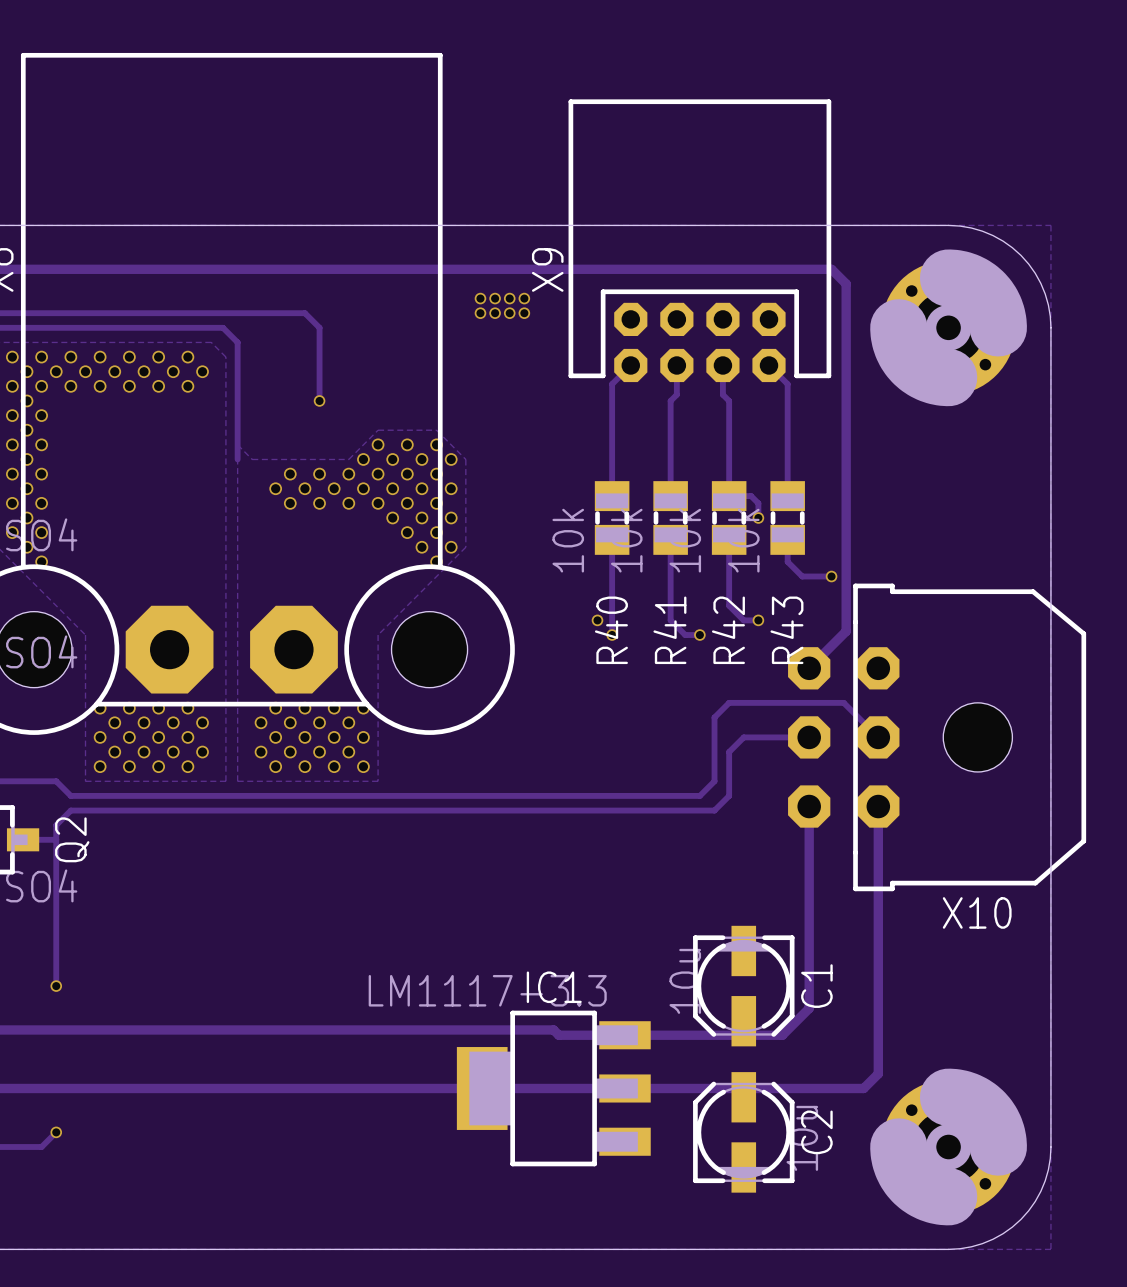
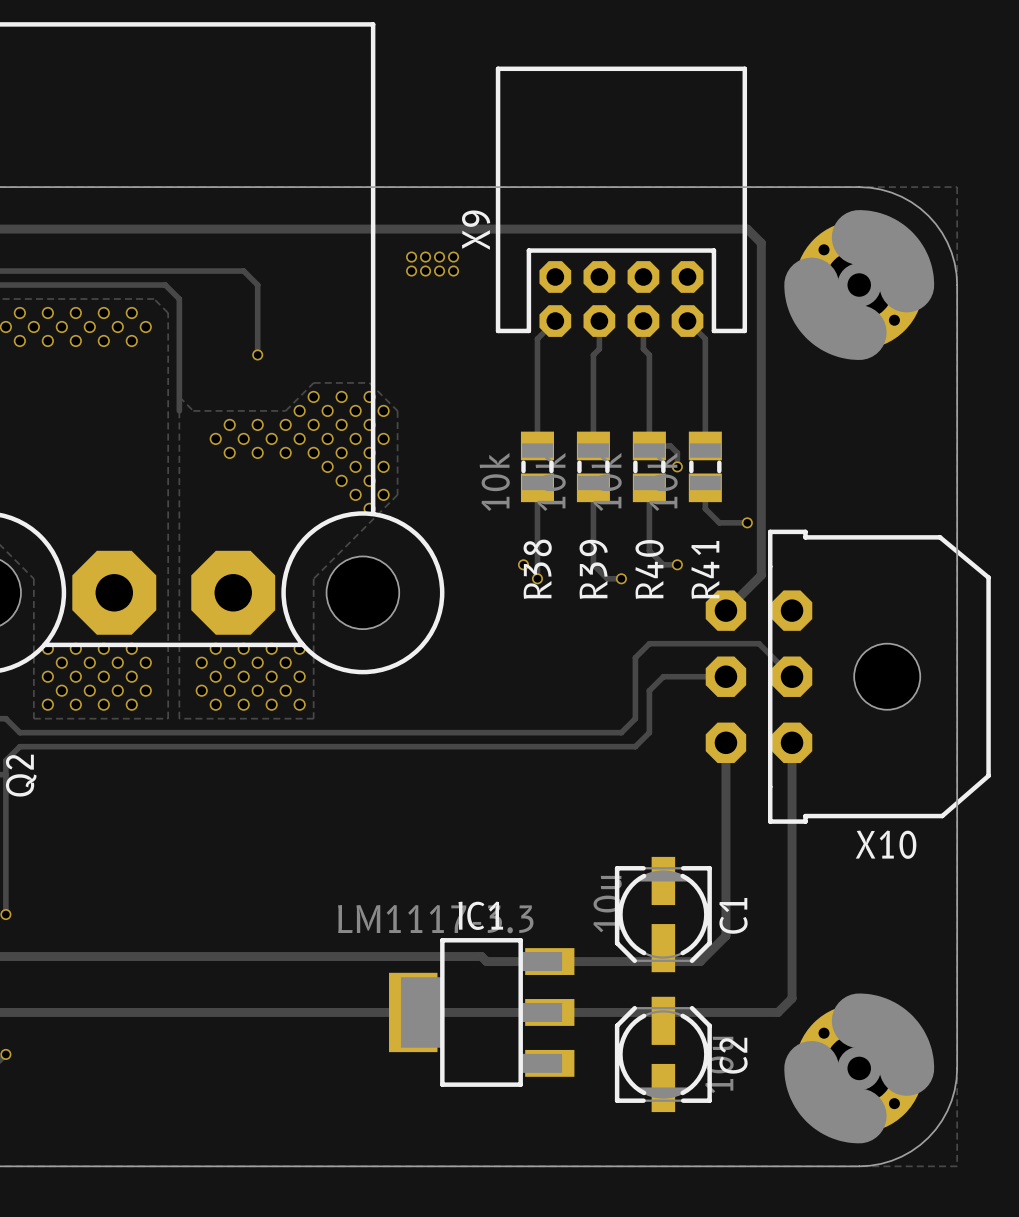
R40 name: R40 (611, 630) -> R38 (537, 569)
R41 name: R41 (669, 630) -> R39 (593, 569)
R42 name: R42 (728, 630) -> R40 (649, 569)
R43 name: R43 (786, 630) -> R41 (705, 569)

